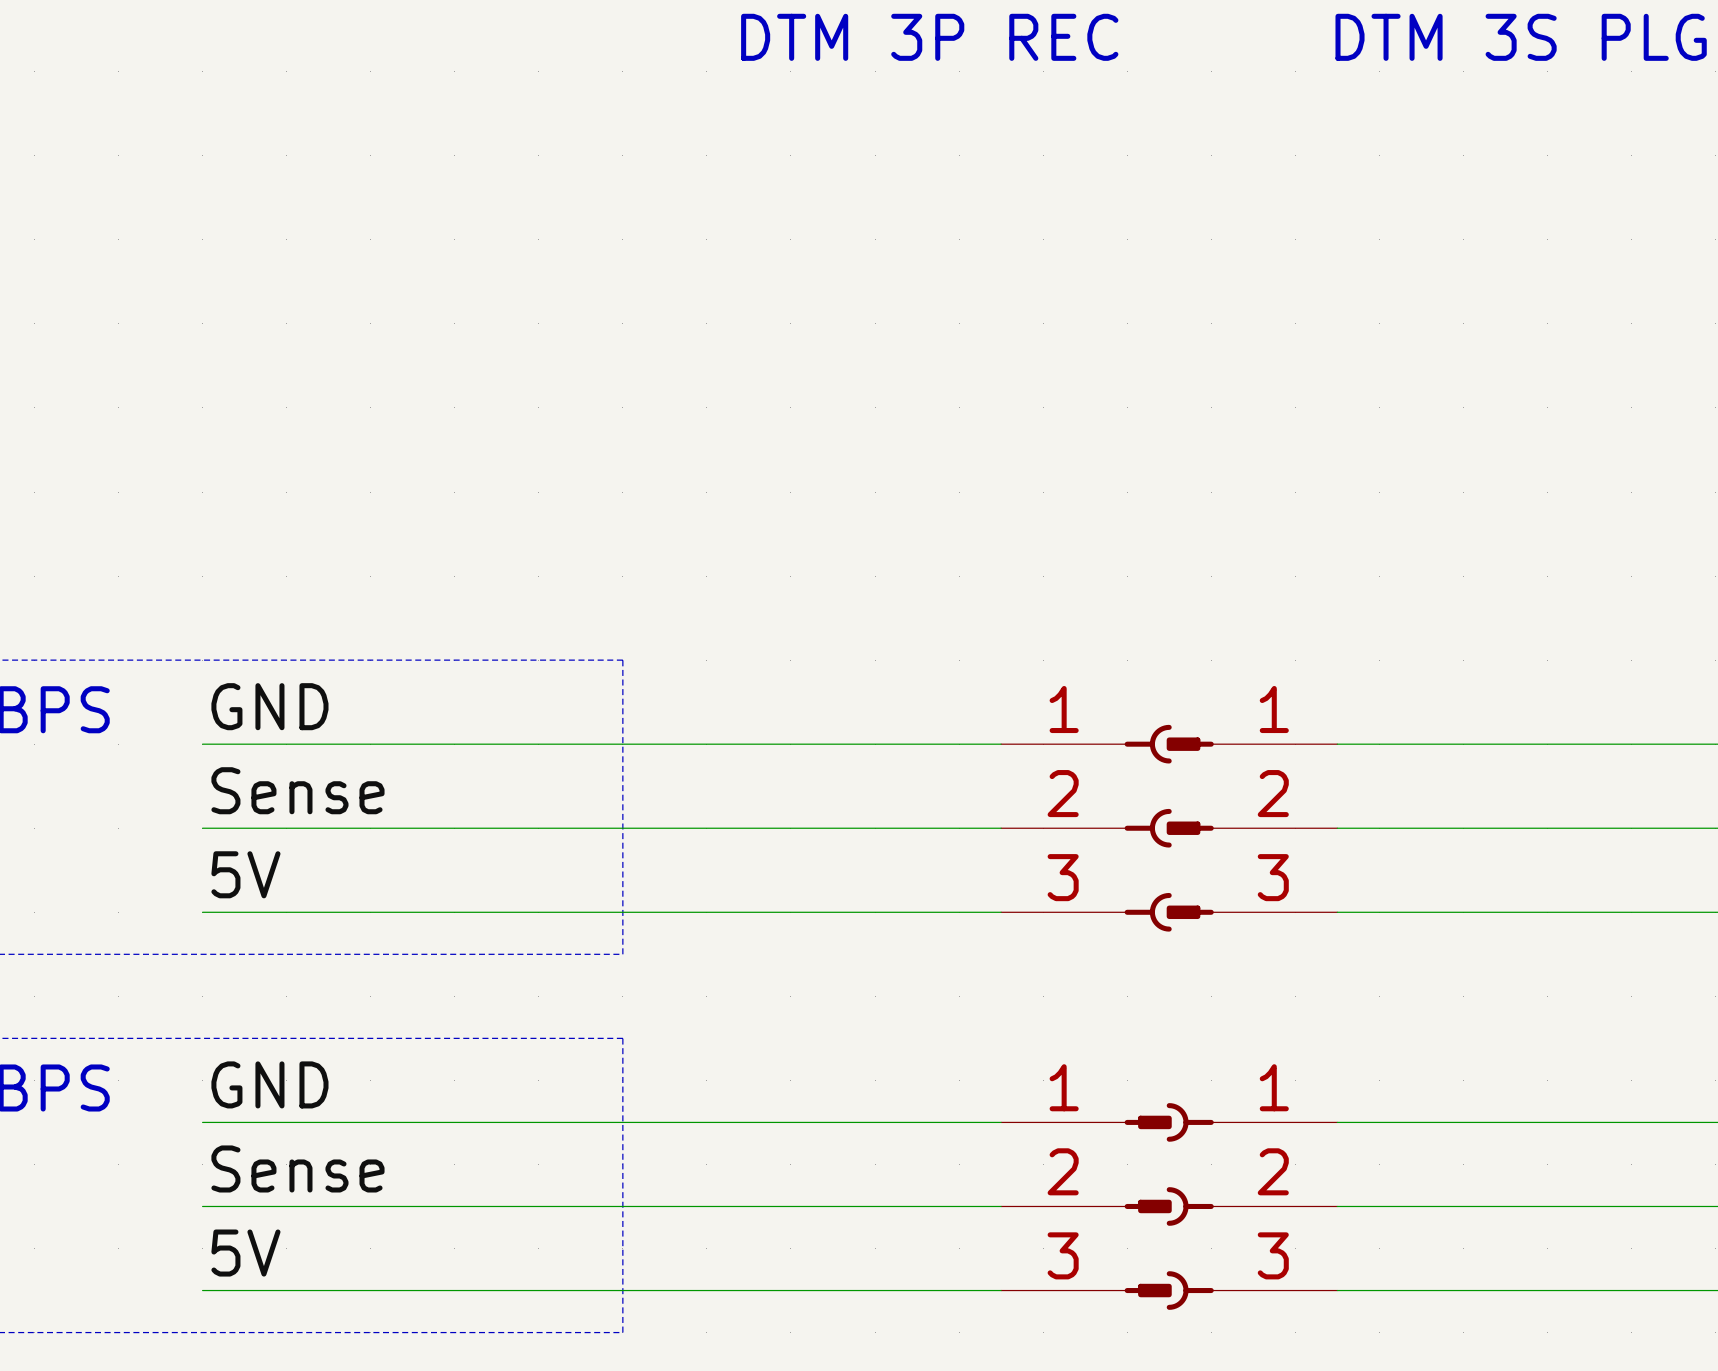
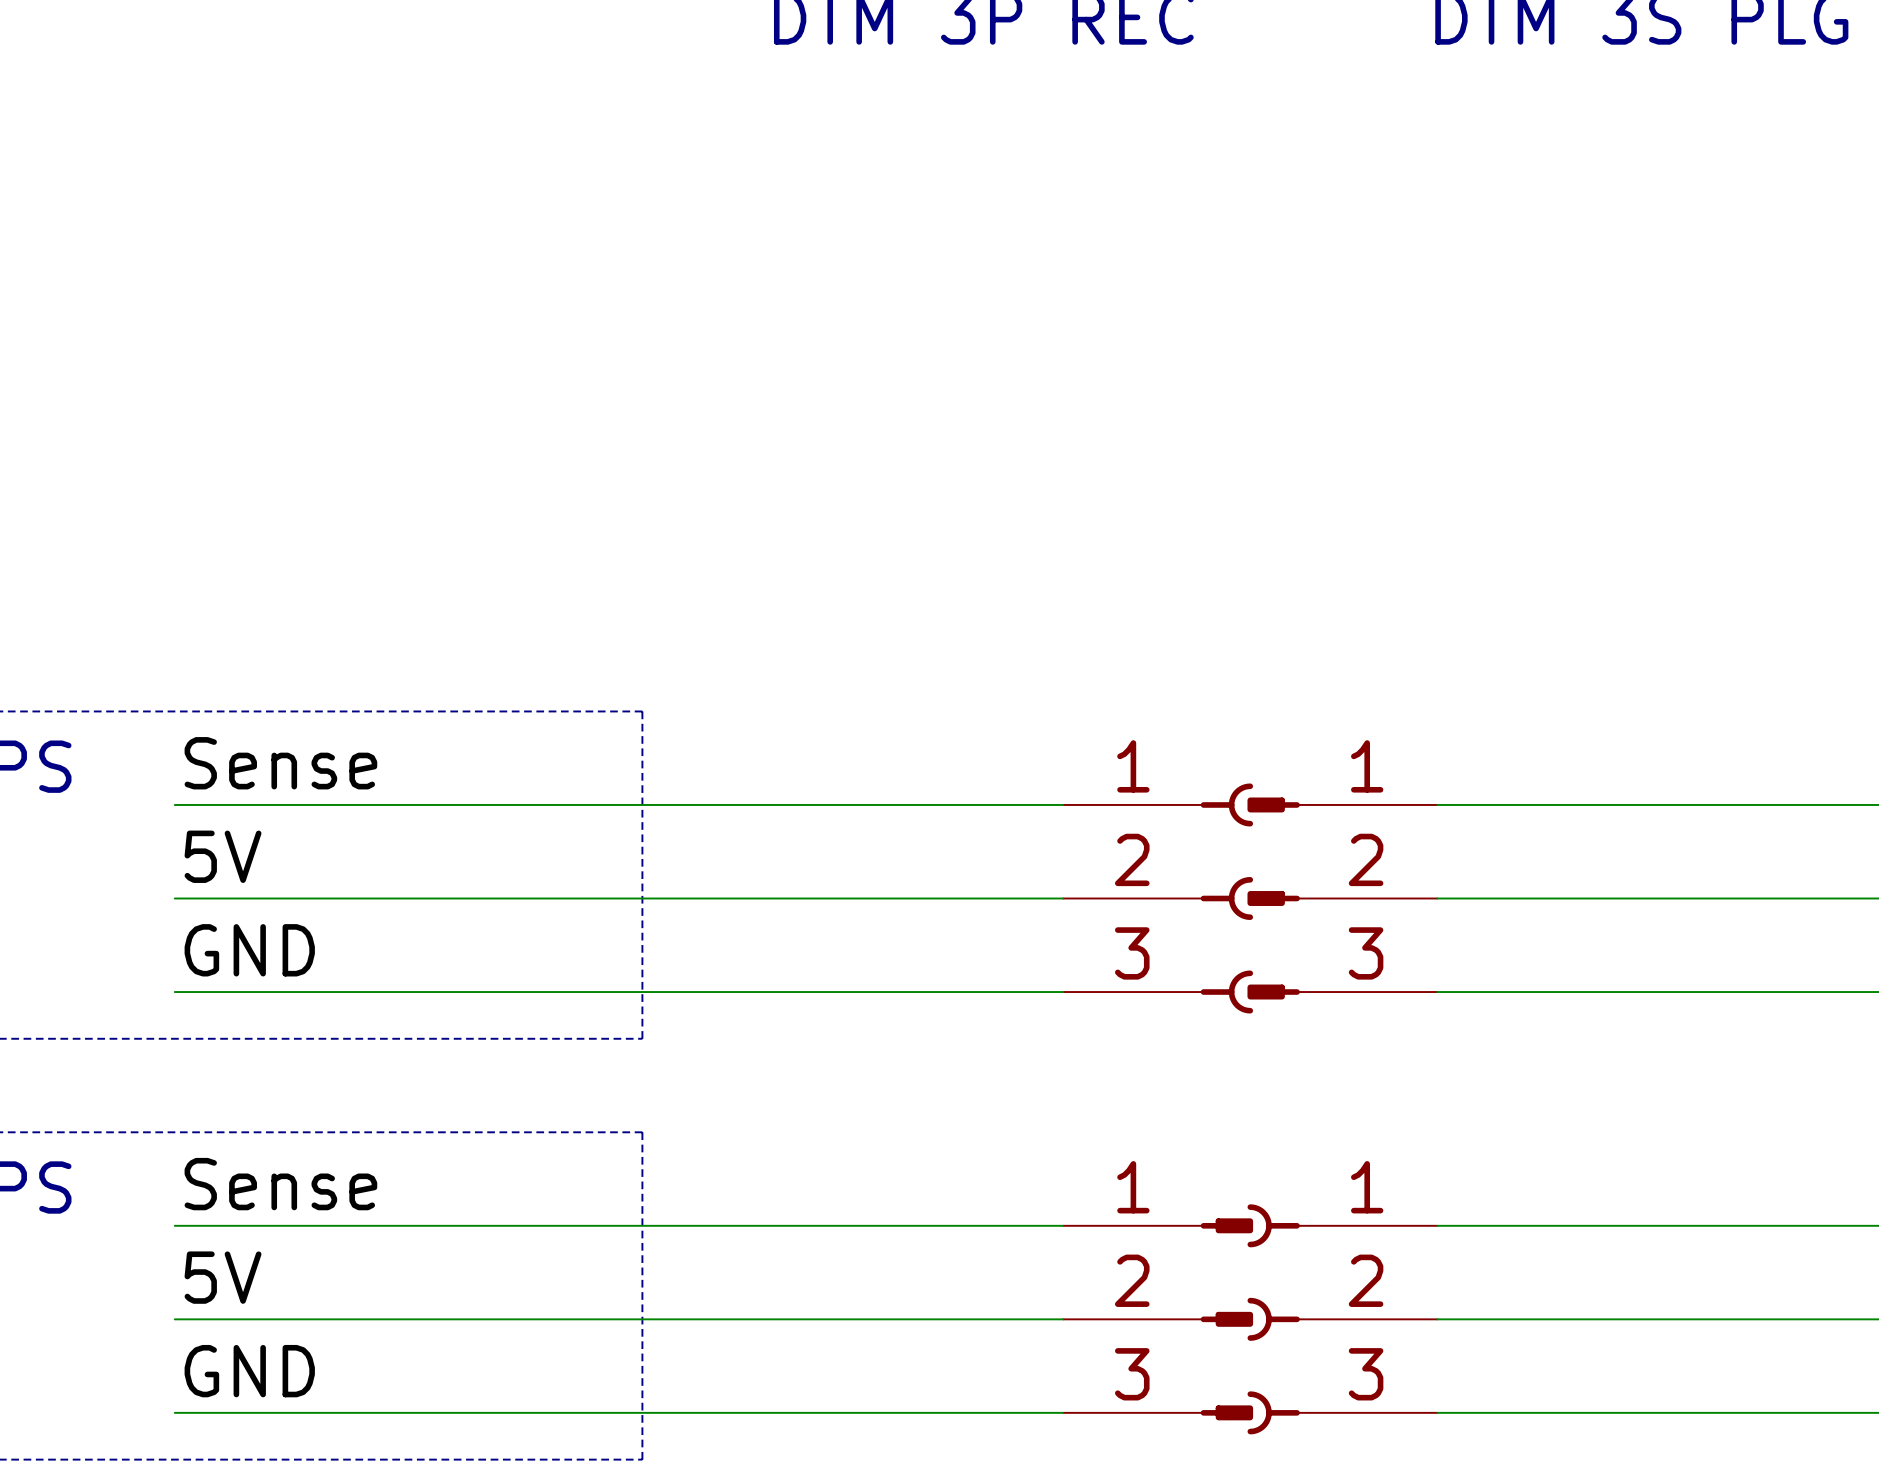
label: GND (269, 706) -> Sense (280, 763)
label: Sense (297, 790) -> 5V (223, 856)
label: 5V (245, 874) -> GND (249, 950)
label: GND (269, 1084) -> Sense (280, 1184)
label: Sense (297, 1168) -> 5V (223, 1277)
label: 5V (245, 1253) -> GND (249, 1371)

